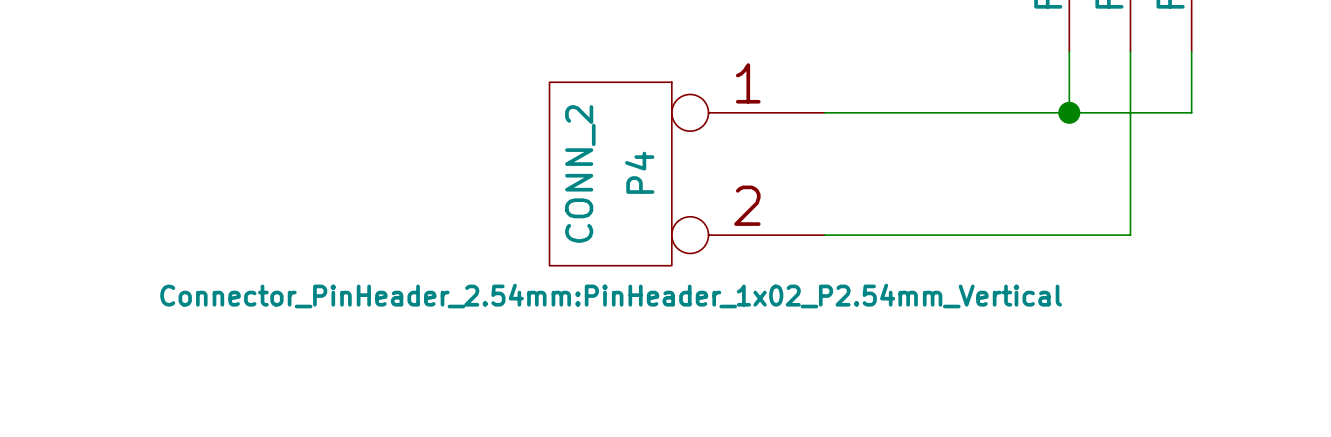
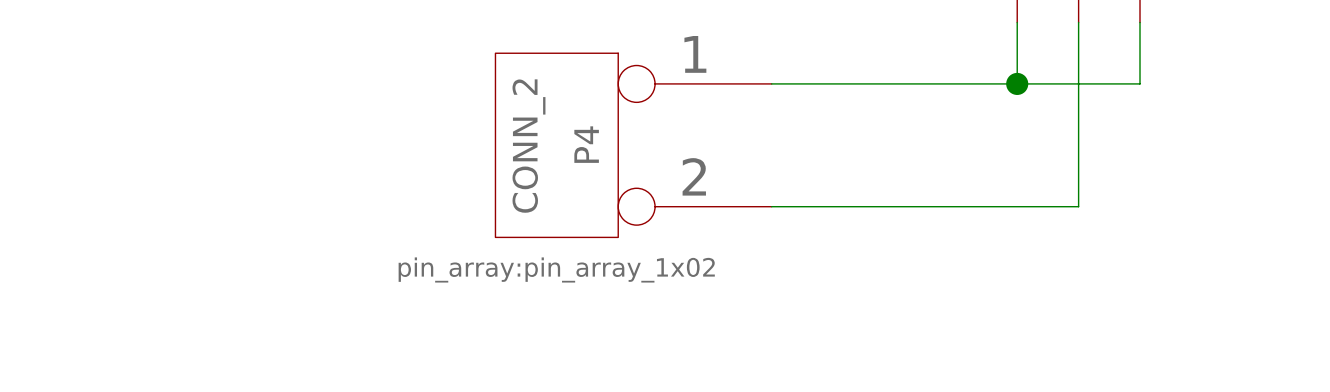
P4 text: Connector_PinHeader_2.54mm:PinHeader_1x02_P2.54mm_Vertical (611, 296) -> pin_array:pin_array_1x02 (556, 269)

